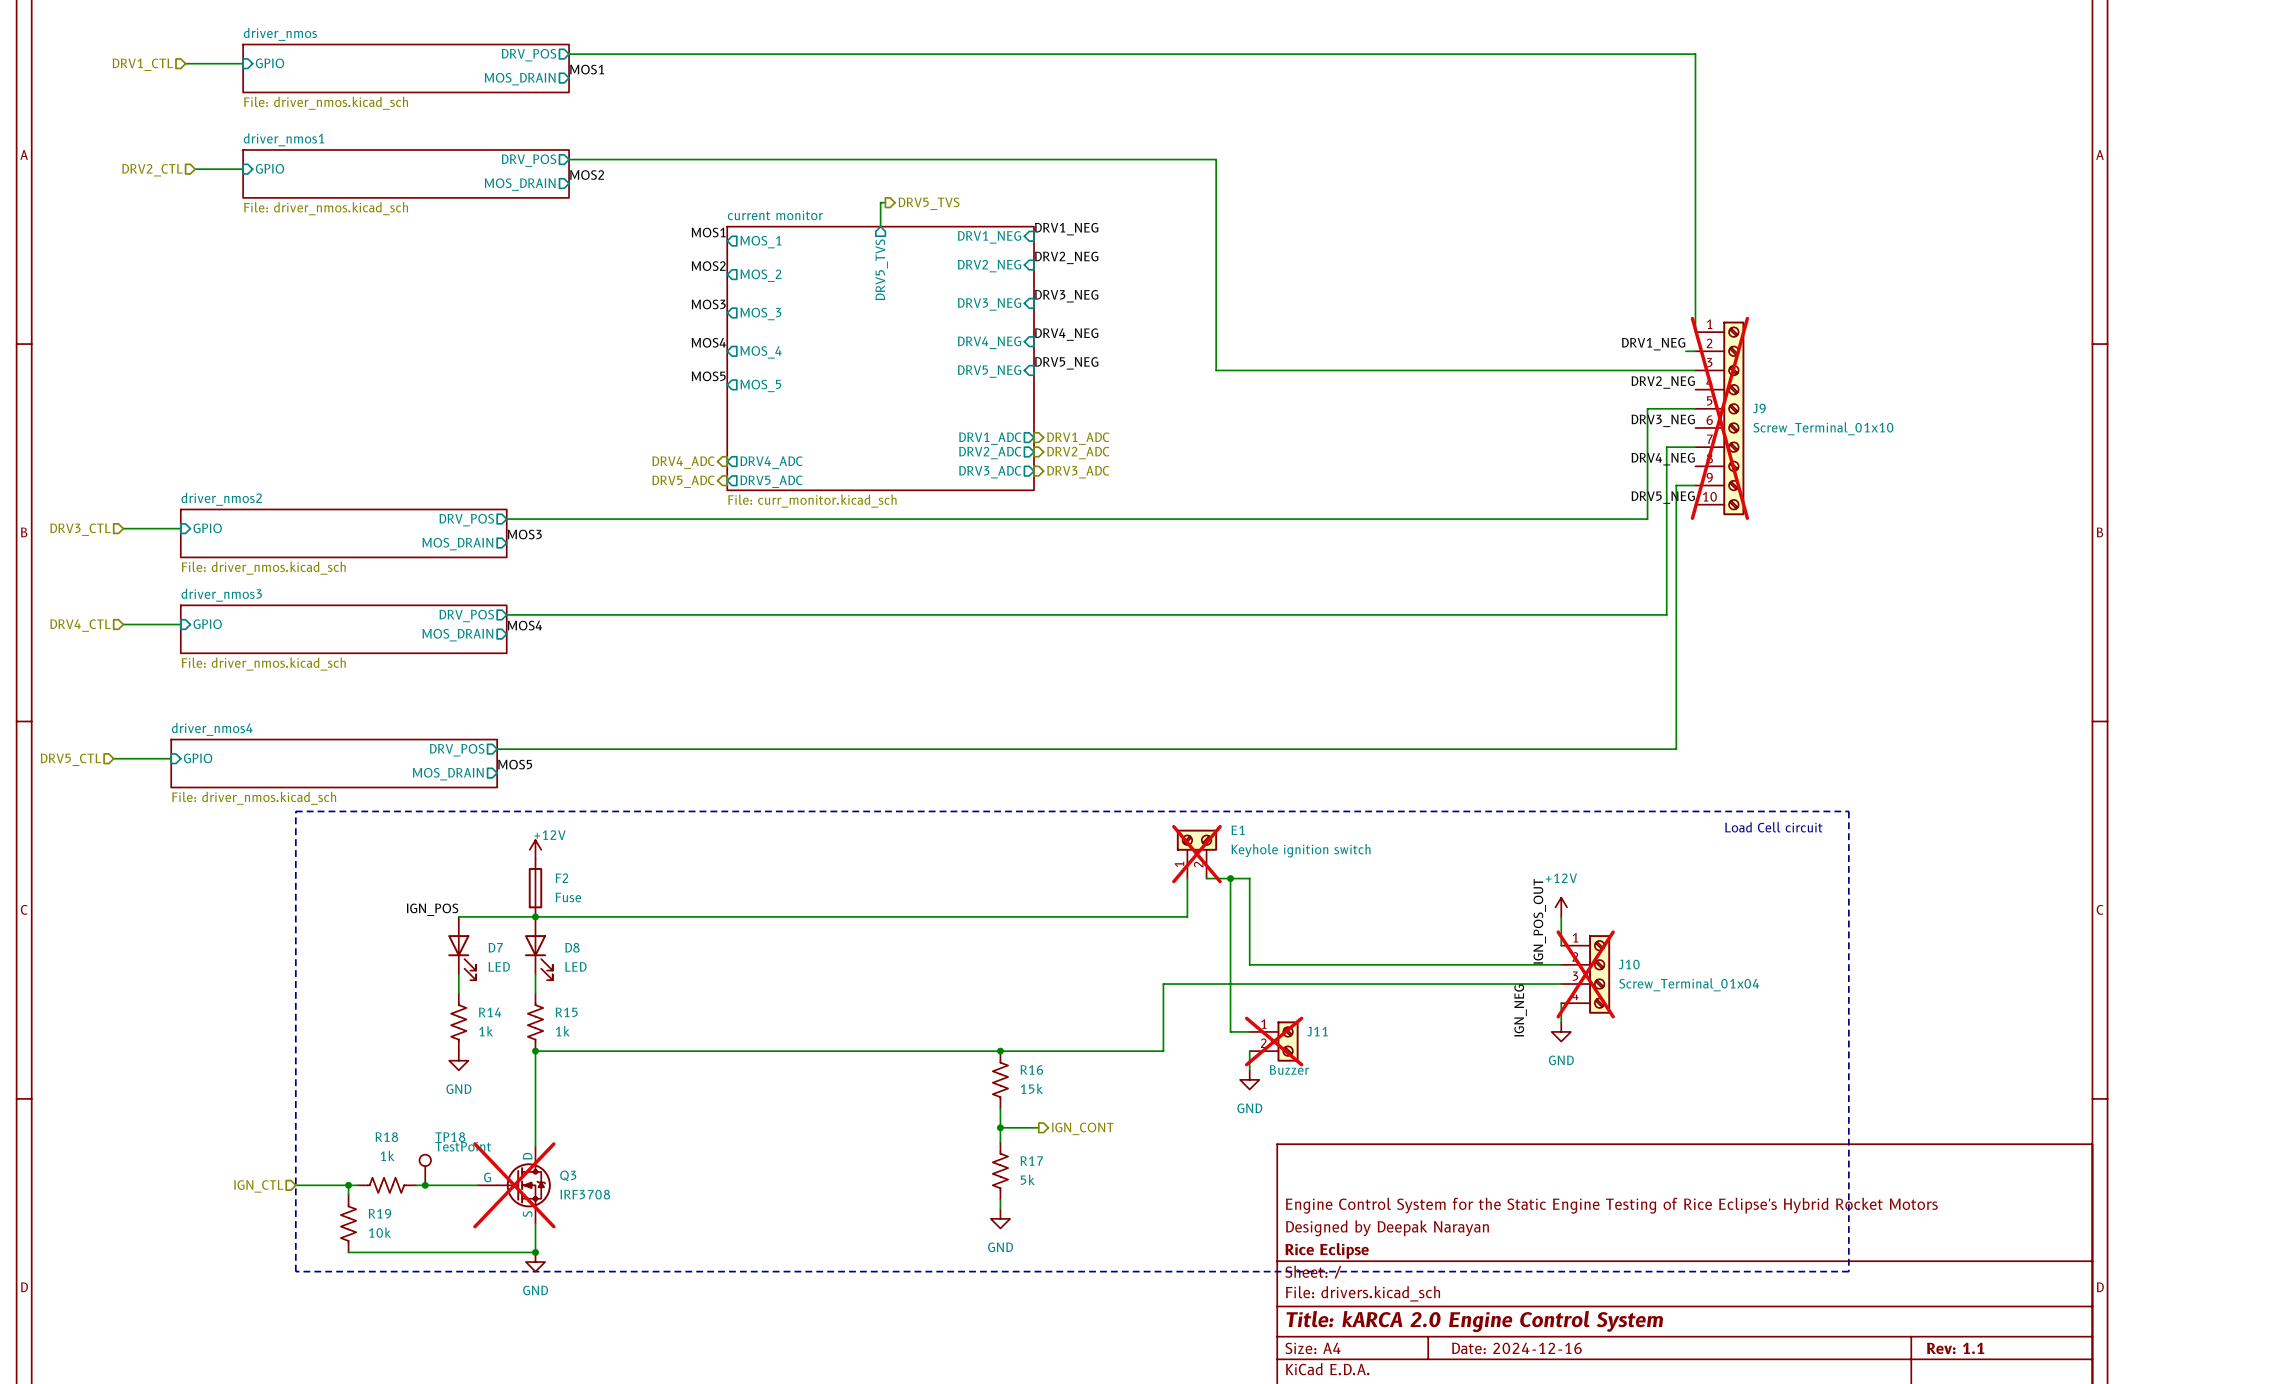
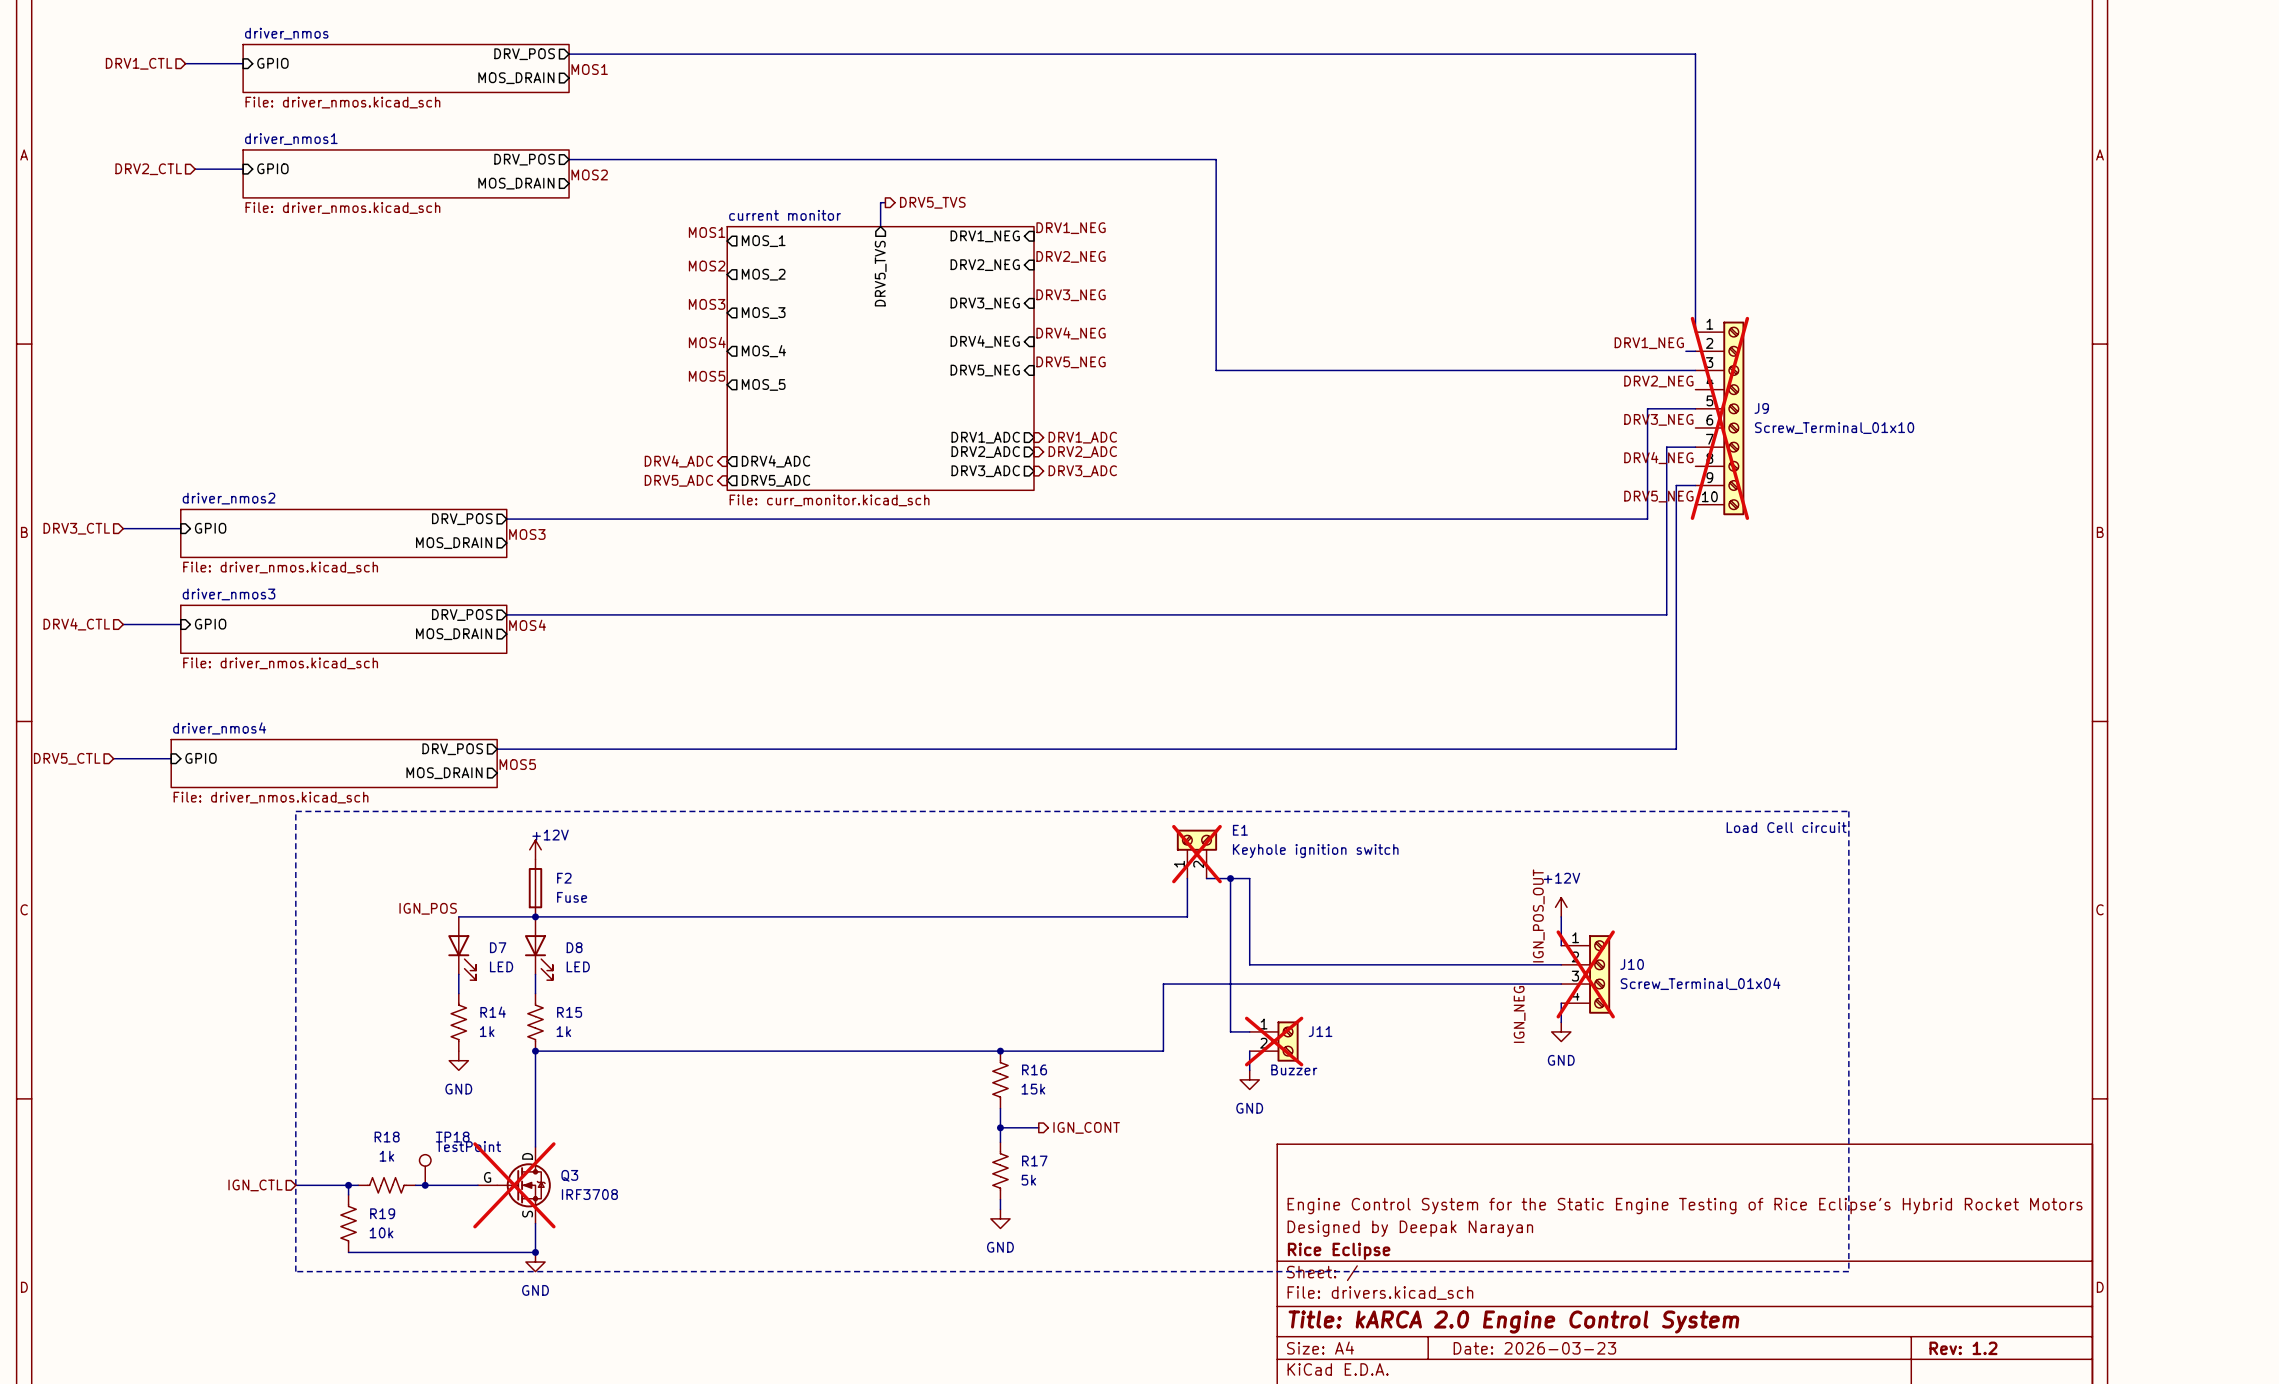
title block: Date: 2024-12-16 (1516, 1348) -> Date: 2026-03-23 (1534, 1348)
title block: Rev: 1.1 (1955, 1348) -> Rev: 1.2 (1963, 1348)

